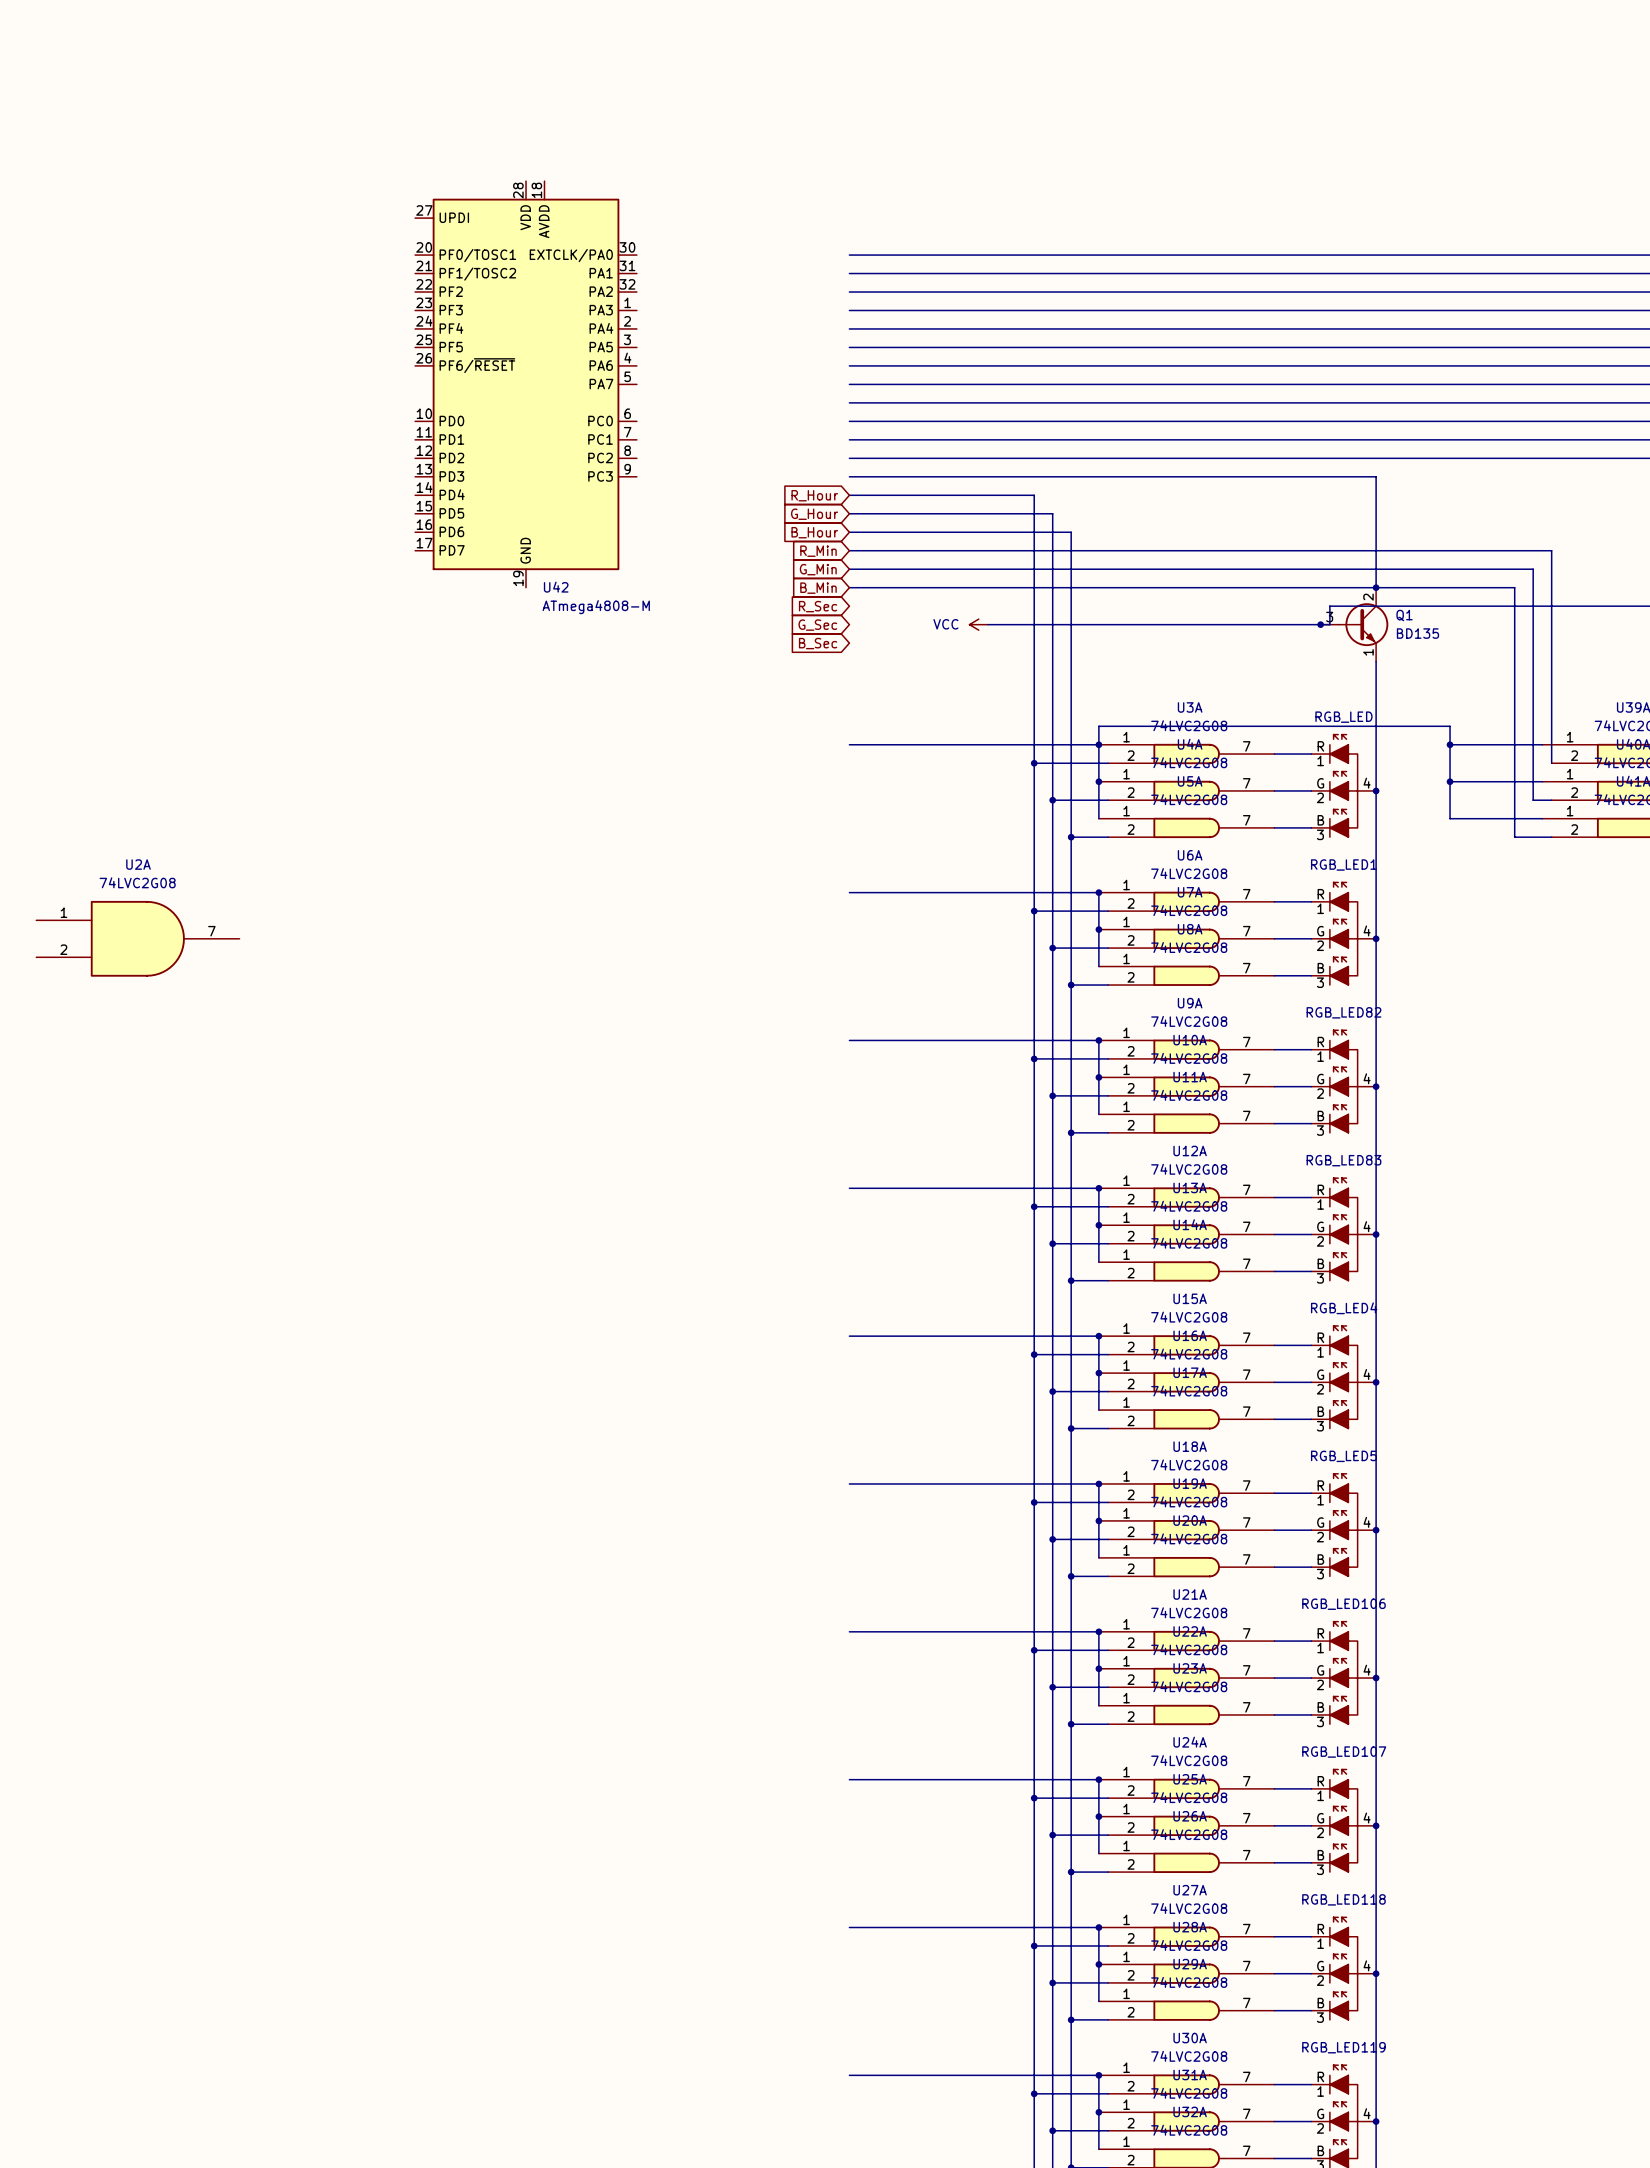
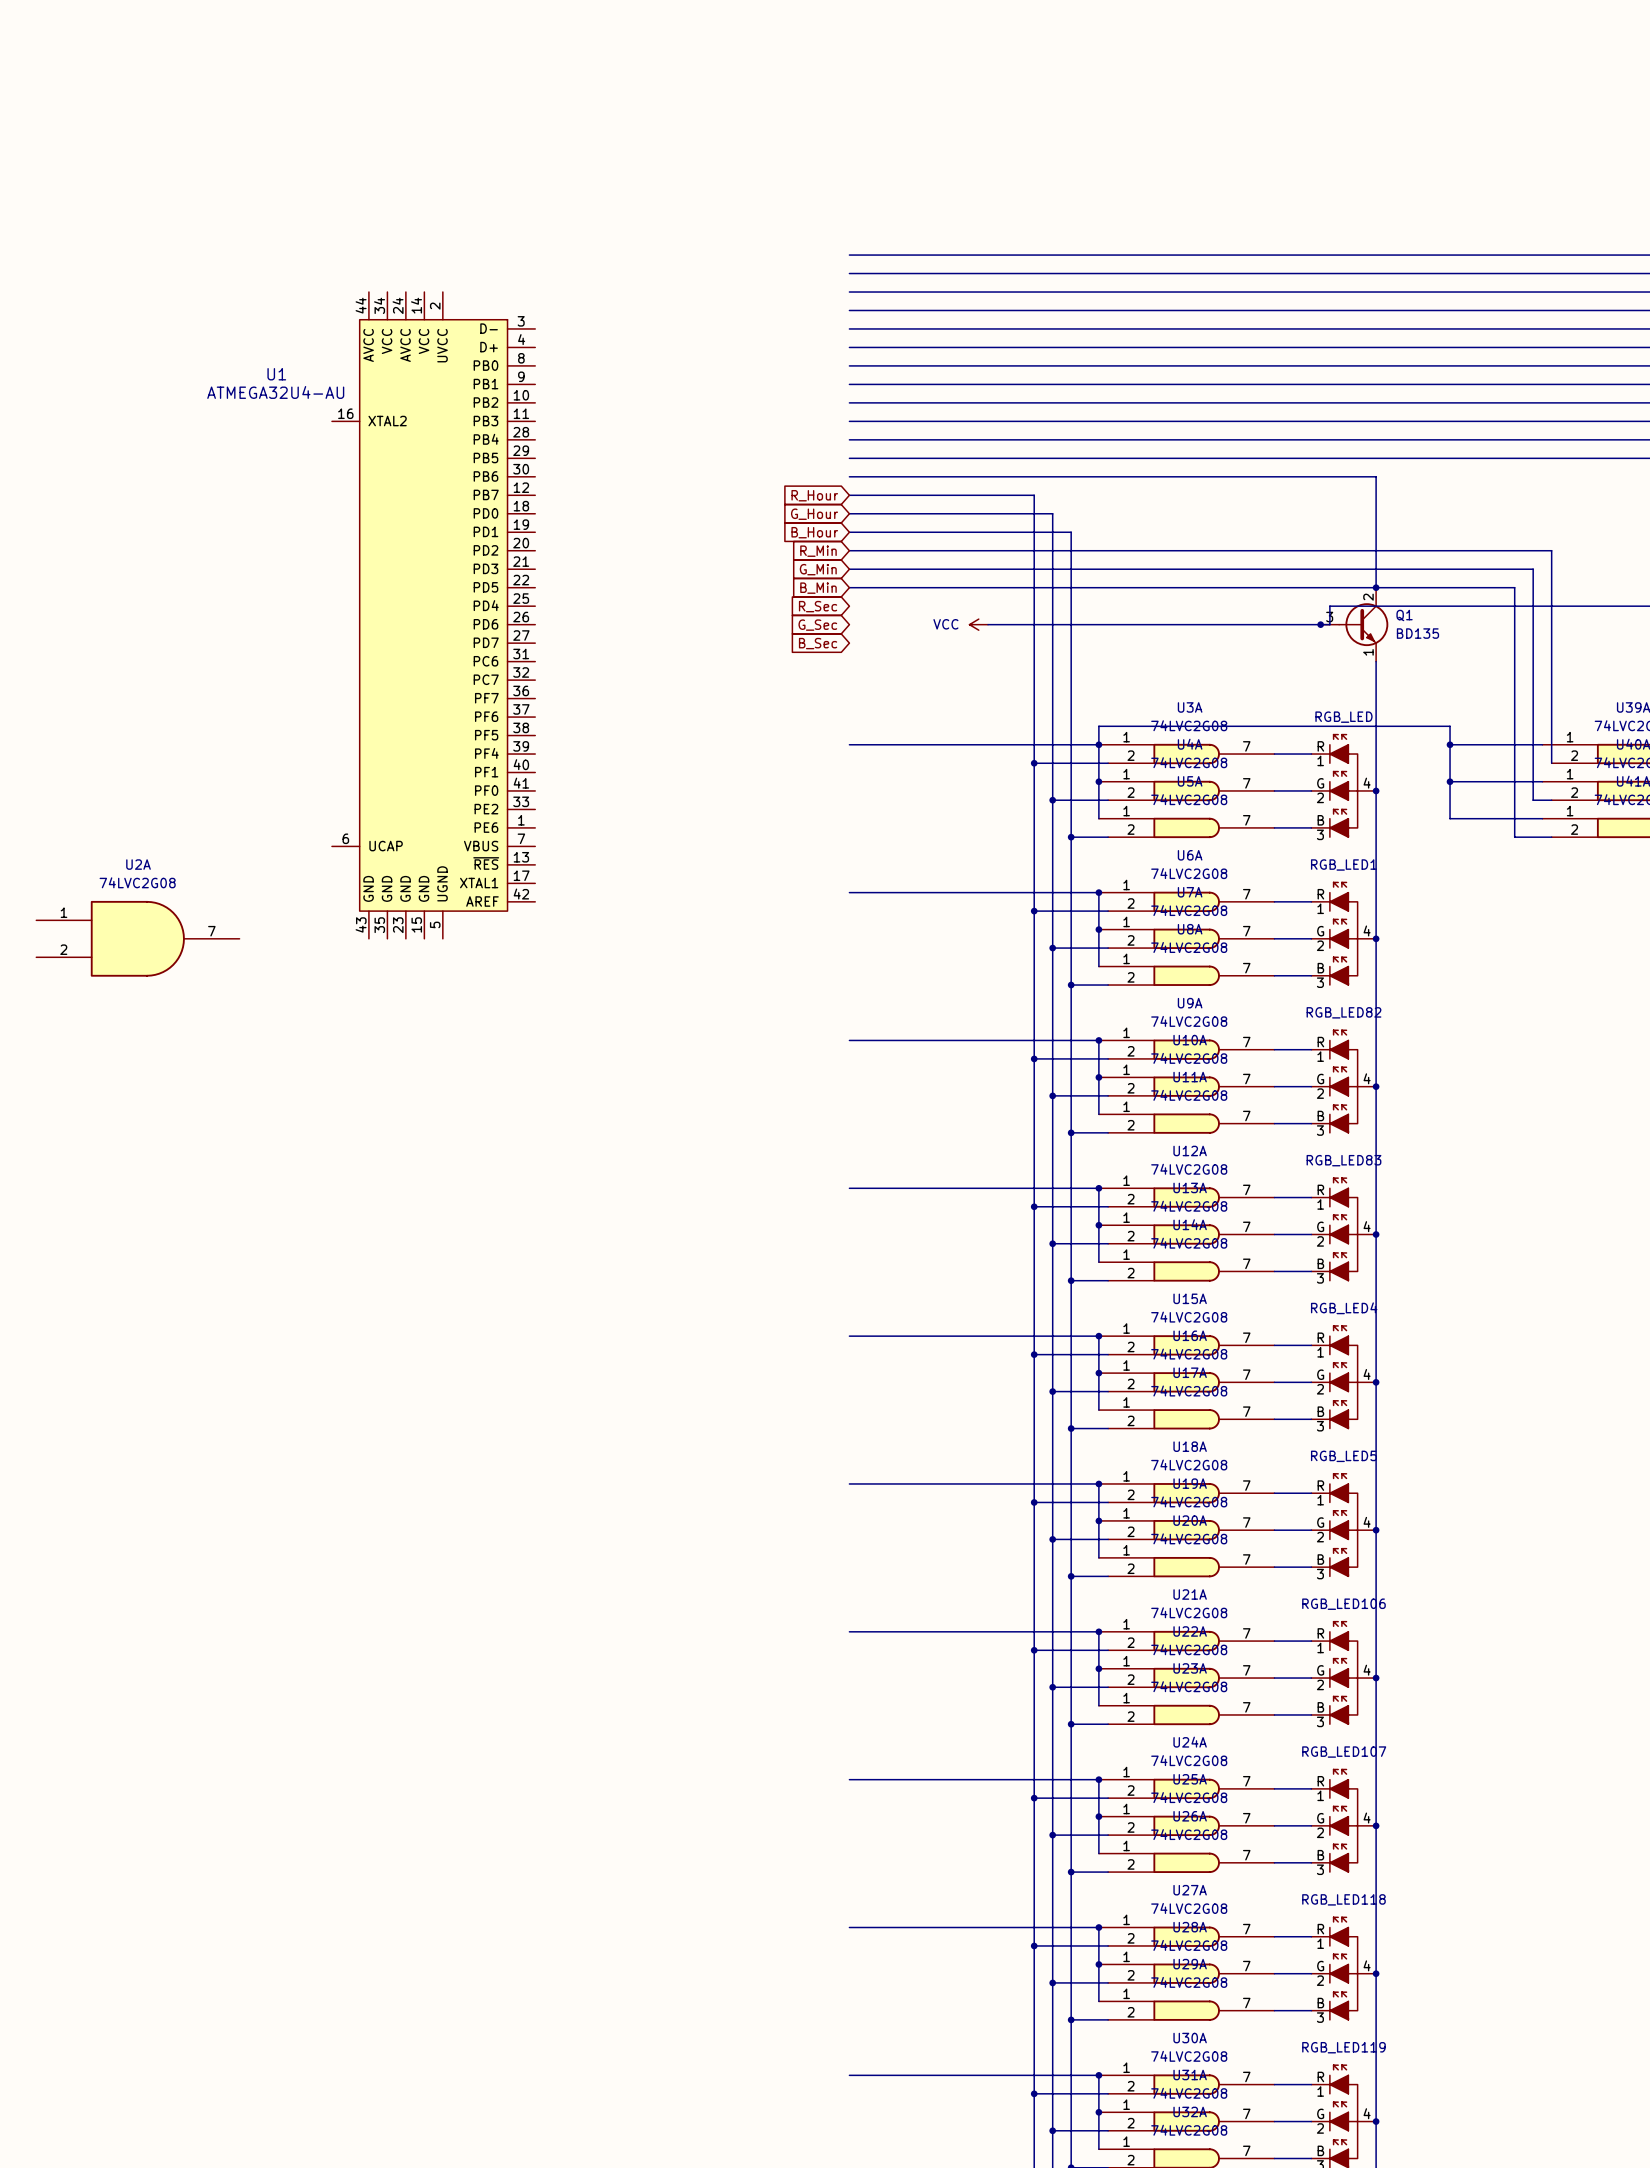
U42: ATmega4808-M (526, 384) -> none
U1: none -> ATMEGA32U4-AU (433, 615)

